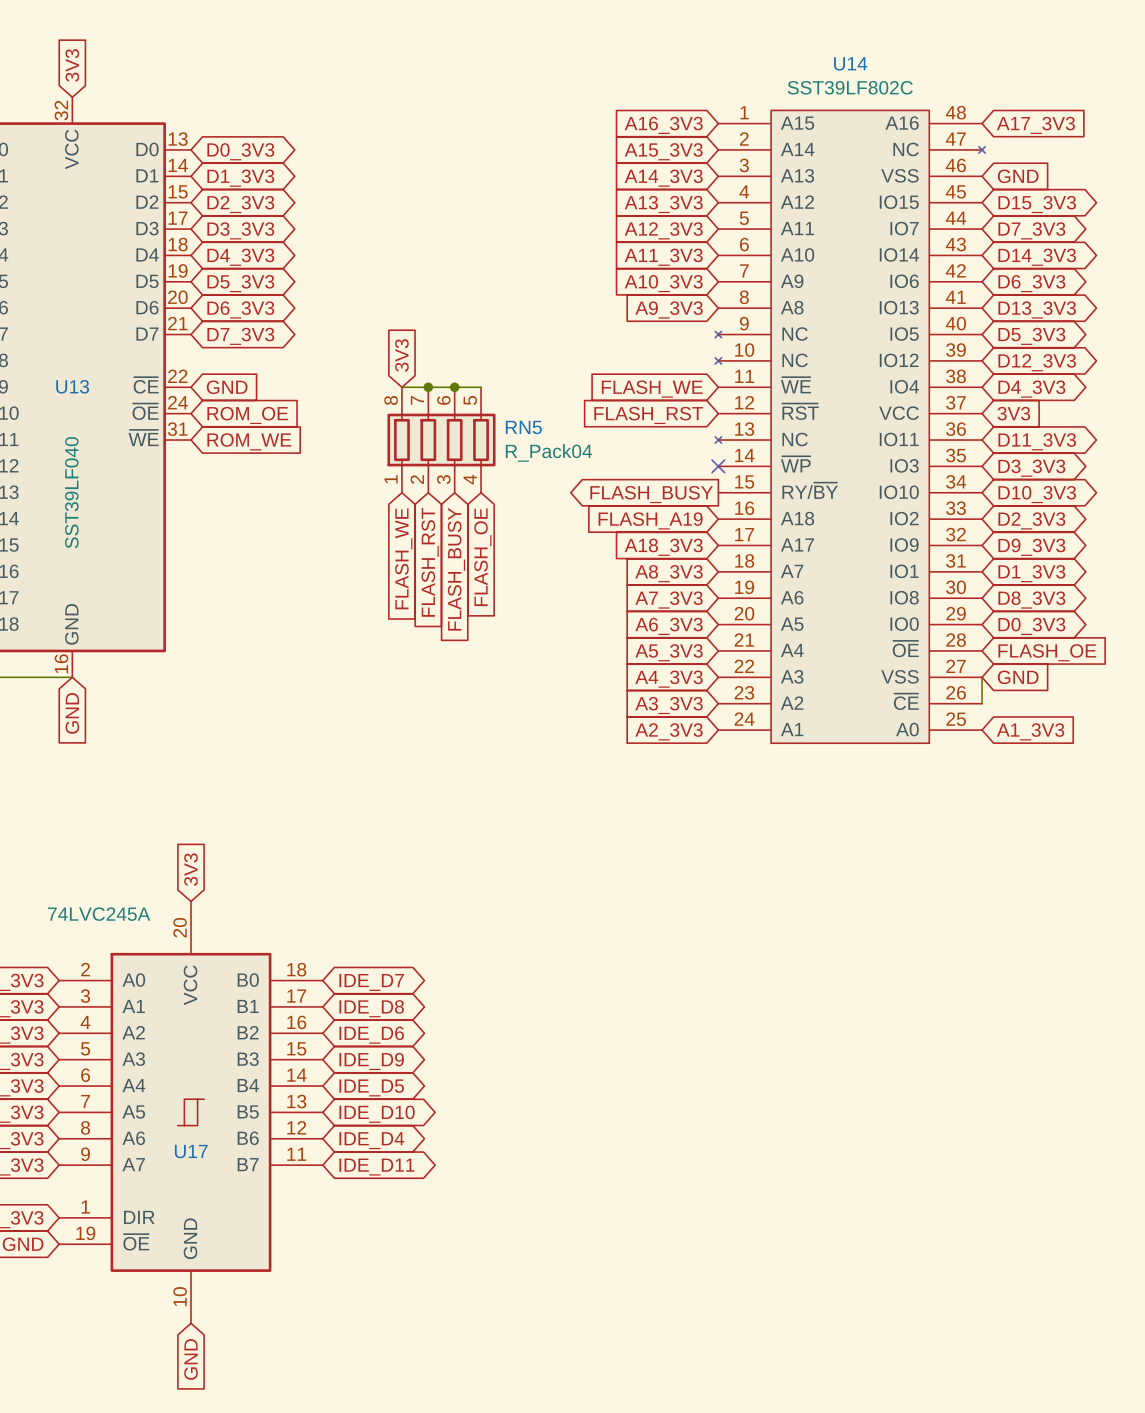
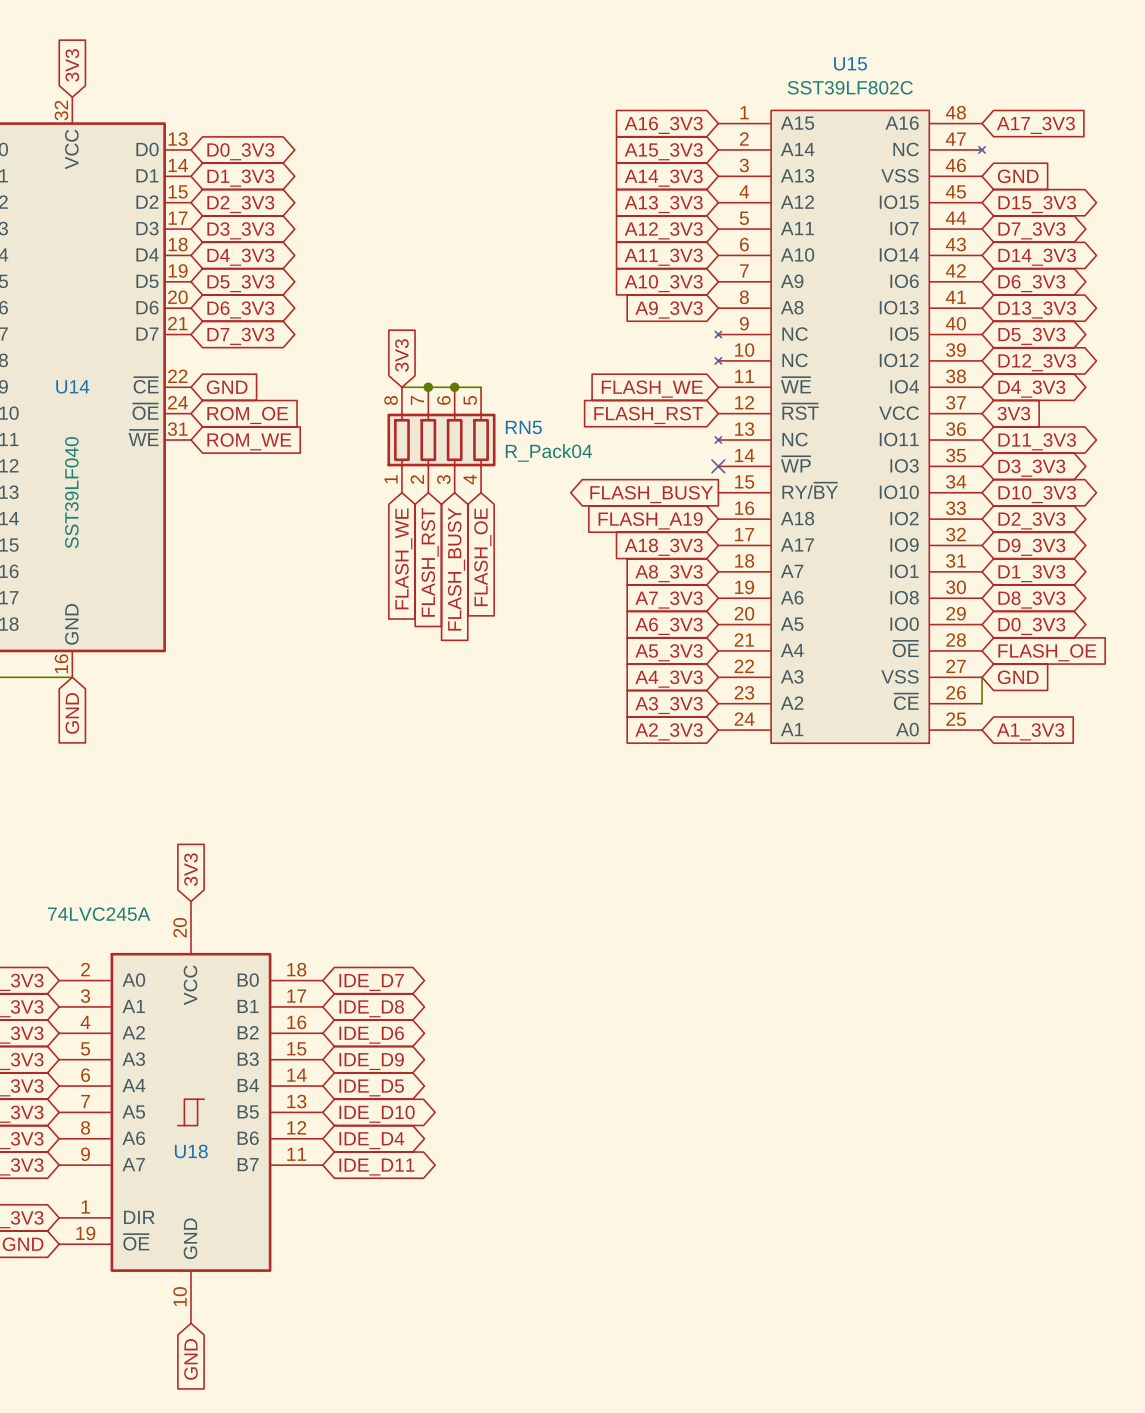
U14 name: U14 (850, 63) -> U15 (850, 63)
U13 name: U13 (72, 386) -> U14 (72, 386)
U17 name: U17 (191, 1151) -> U18 (191, 1151)

